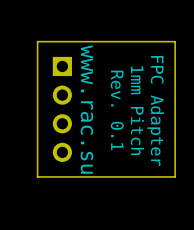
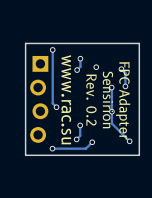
track: none -> (52, 49) (52, 103) (56, 107)
via: none -> (52, 49)
part footprint: [52, 56, 72, 162] -> [30, 55, 49, 143]
track: none -> (80, 58) (80, 66) (77, 70)
via: none -> (80, 58)
via: none -> (96, 67)
track: none -> (121, 69) (125, 73) (125, 86)
via: none -> (121, 69)
via: none -> (77, 70)
via: none -> (125, 86)
track: none -> (111, 87) (111, 123) (129, 141)
via: none -> (111, 87)
text: Rev. 0.1 (117, 110) -> Rev. 0.2 (91, 100)
text: 1mm Pitch (137, 110) -> Sensirion (107, 99)
via: none -> (56, 107)
via: none -> (111, 111)
track: none -> (80, 125) (80, 135) (76, 139)
via: none -> (80, 125)
via: none -> (76, 139)
via: none -> (129, 141)
track: none -> (92, 142) (85, 148) (52, 148)
via: none -> (92, 142)
via: none -> (52, 148)

